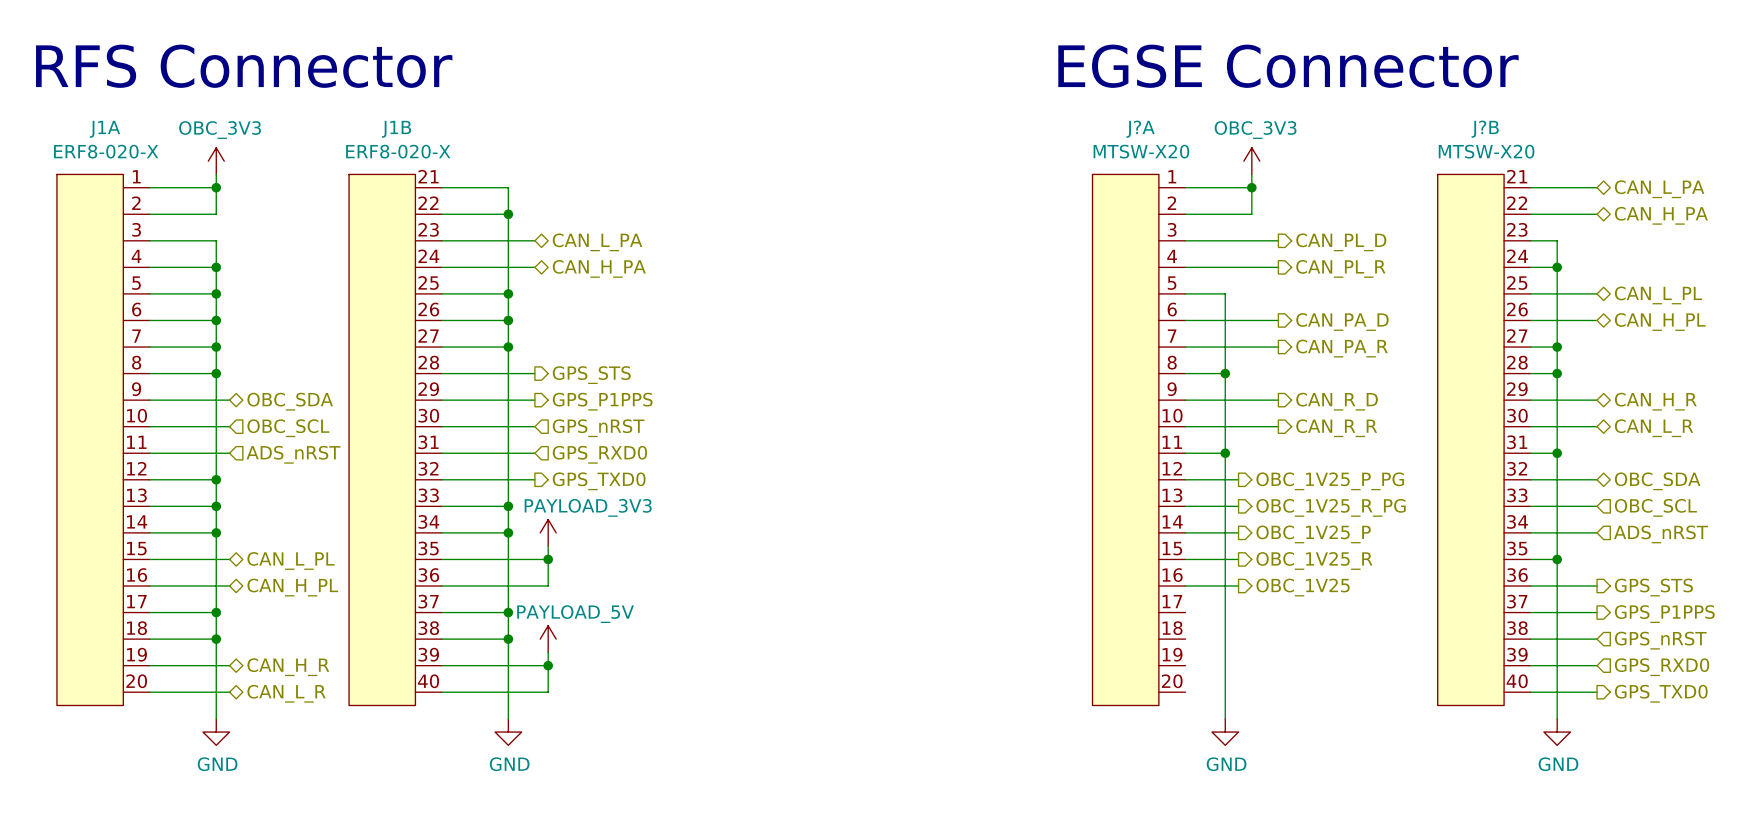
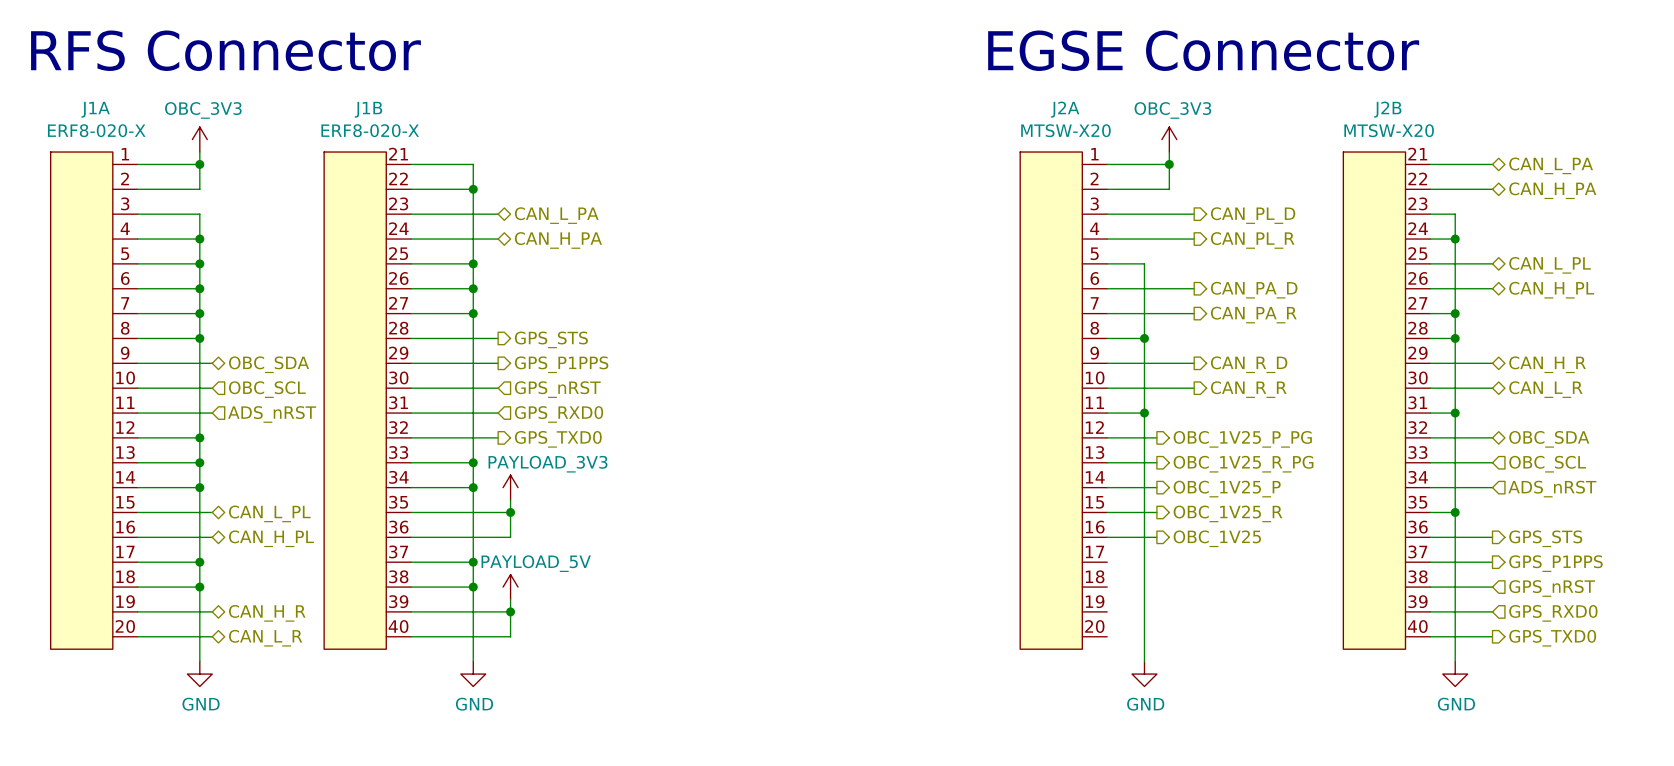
J?A name: J?A (1140, 129) -> J2A (1065, 109)
J?B name: J?B (1485, 129) -> J2B (1387, 109)

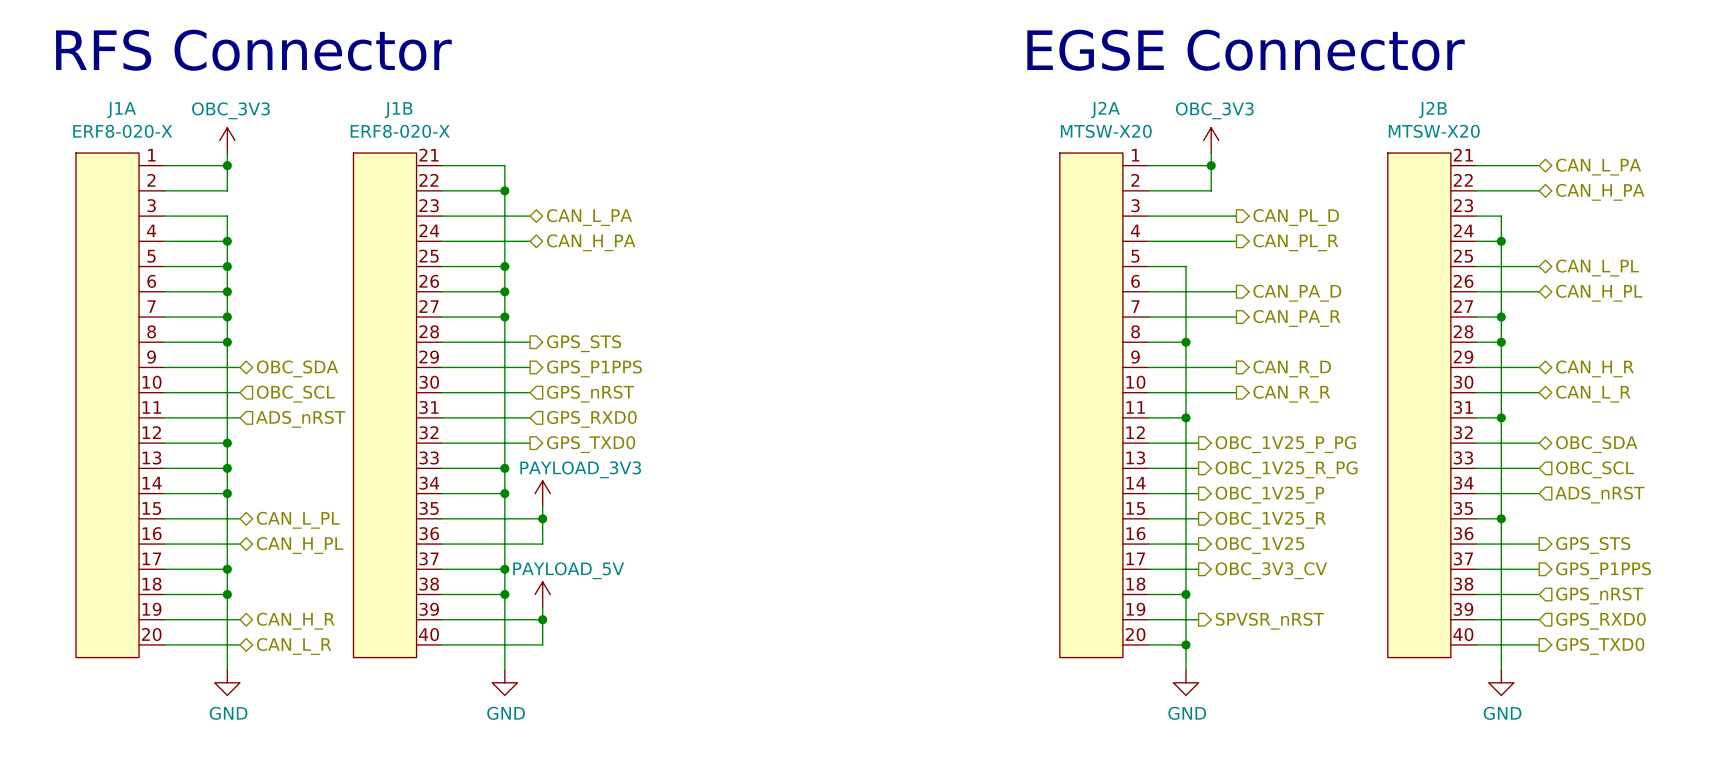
wire: none -> (1148, 569) (1198, 569)
hierarchical label: none -> OBC_3V3_CV (1271, 570)
wire: none -> (1148, 594) (1185, 594)
junction: none -> (1185, 594)
wire: none -> (1148, 619) (1198, 619)
hierarchical label: none -> SPVSR_nRST (1269, 621)
wire: none -> (1148, 644) (1185, 644)
junction: none -> (1185, 644)

